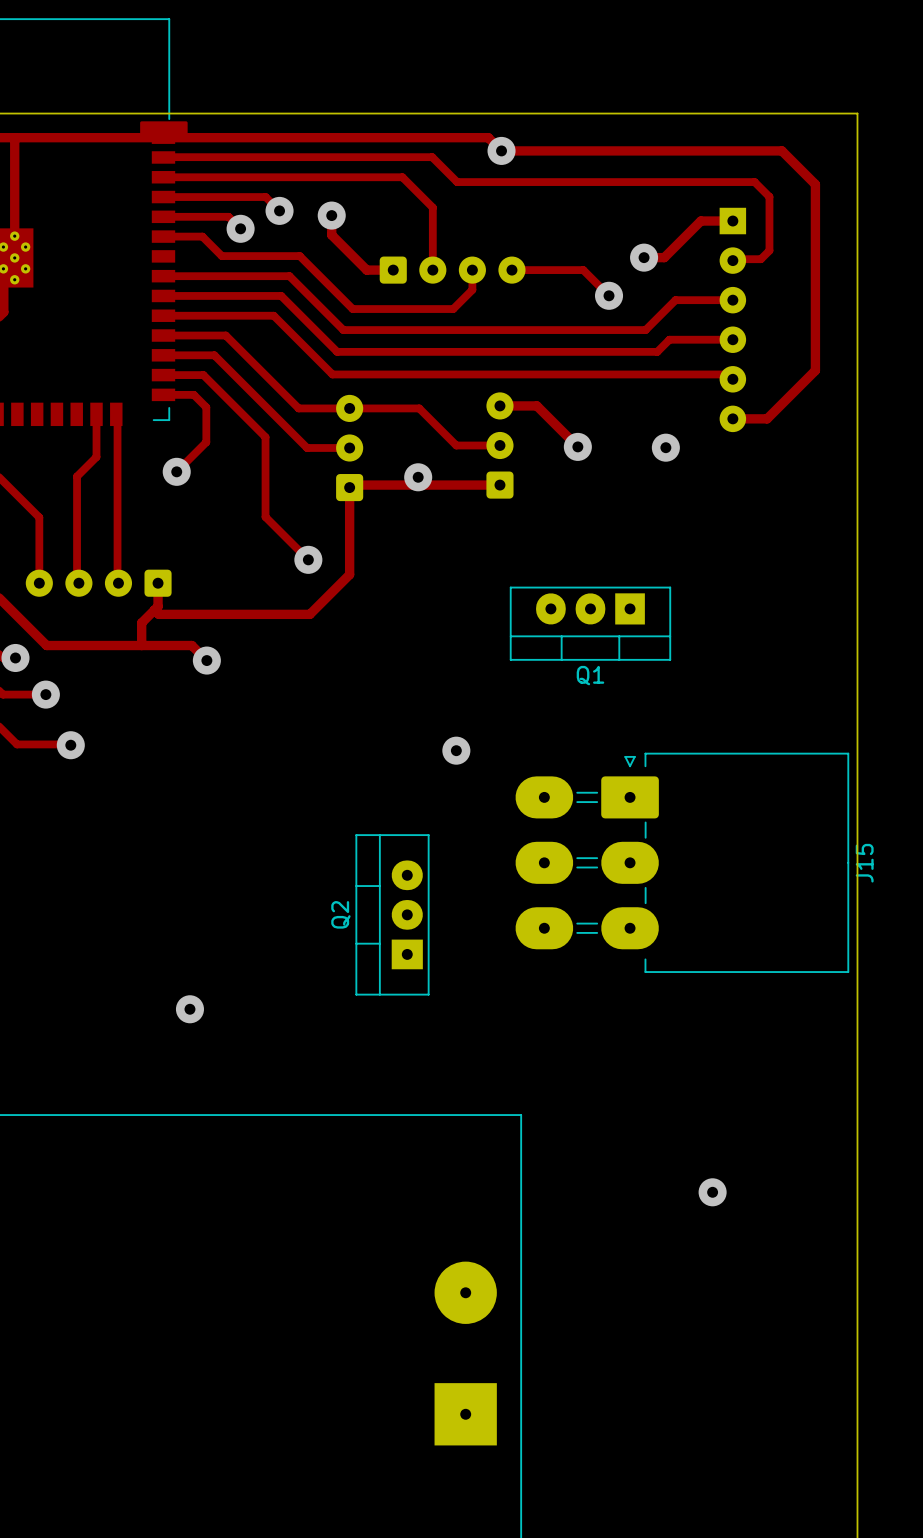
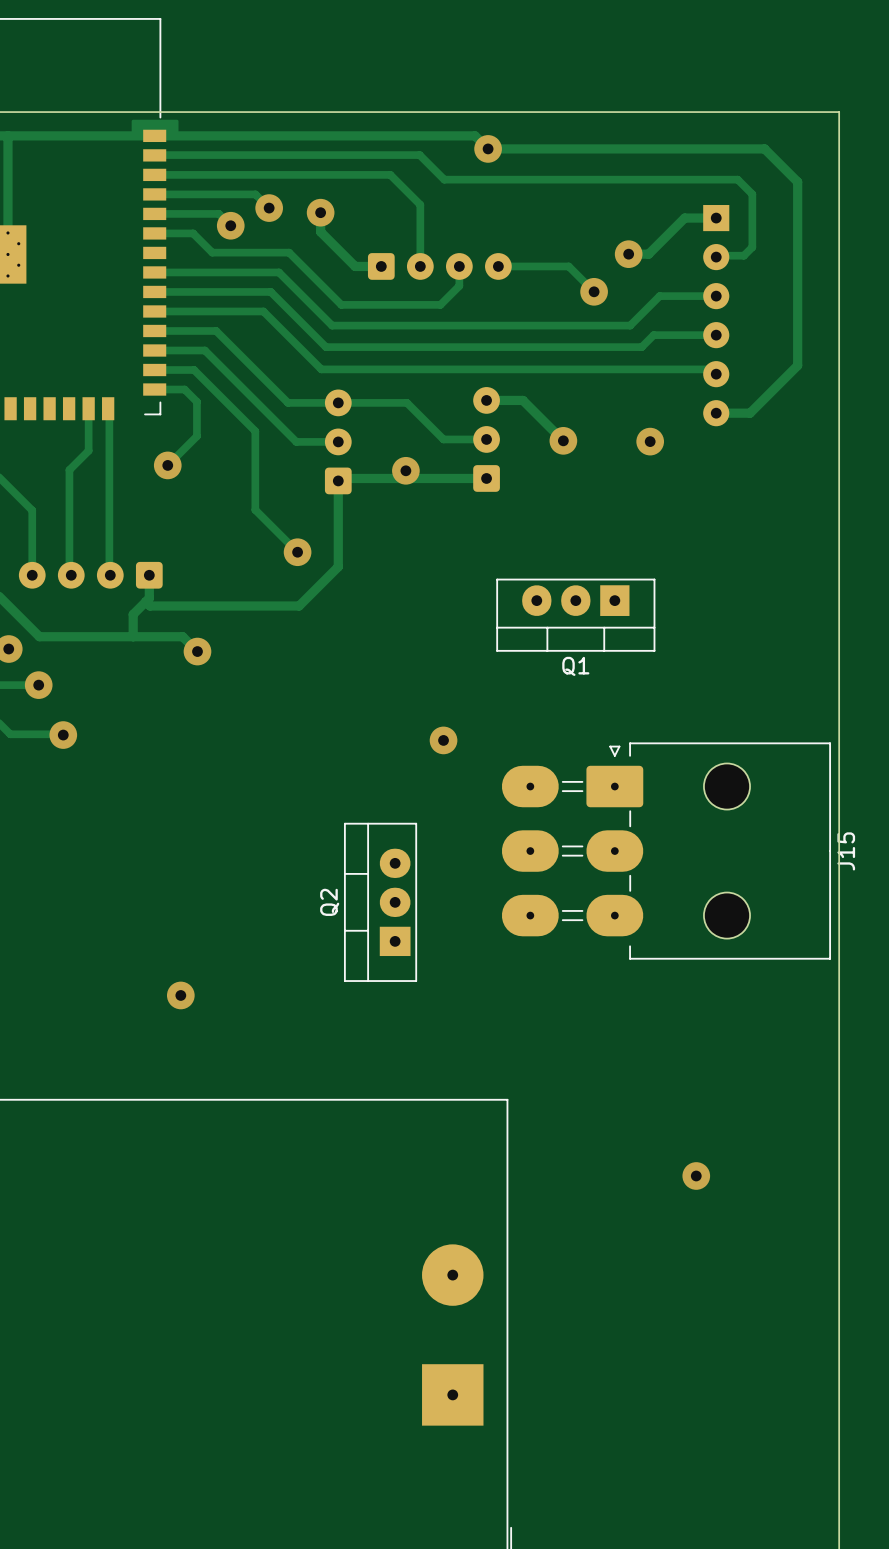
J15 footprint: [515, 752, 850, 973] -> [501, 742, 832, 960]

